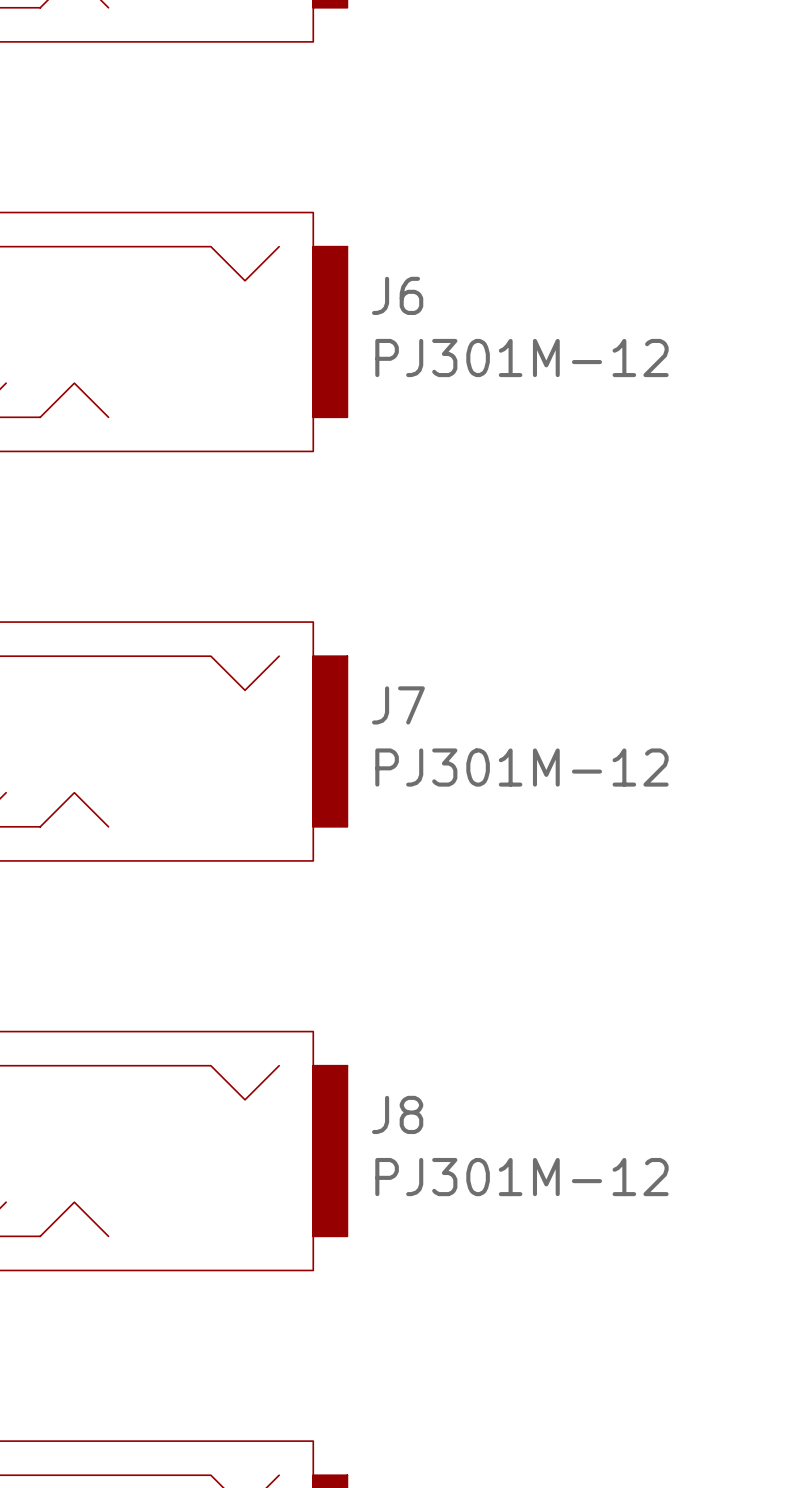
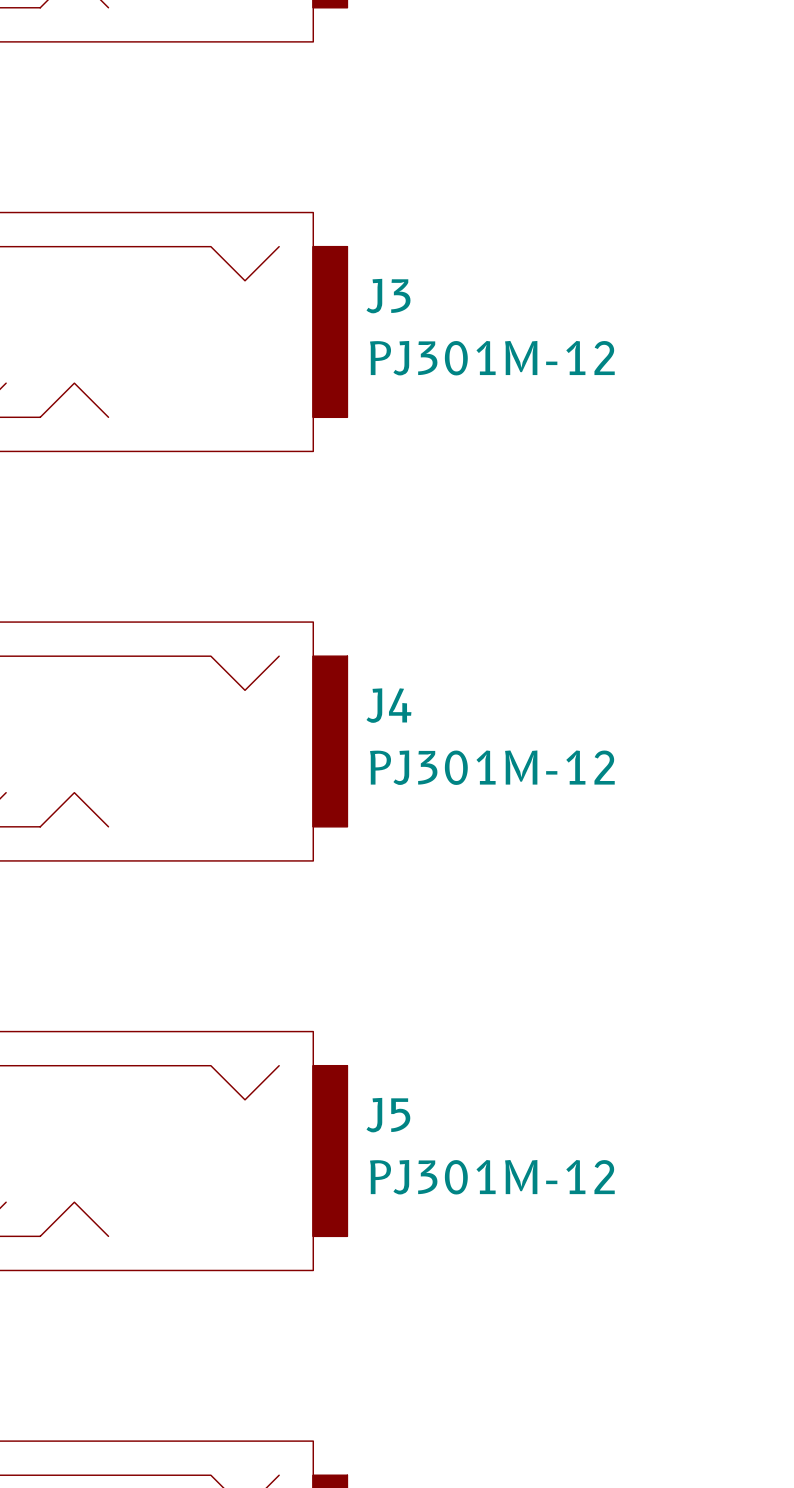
J6 name: J6 (397, 295) -> J3 (388, 296)
J7 name: J7 (398, 705) -> J4 (388, 705)
J8 name: J8 (397, 1114) -> J5 (388, 1115)

